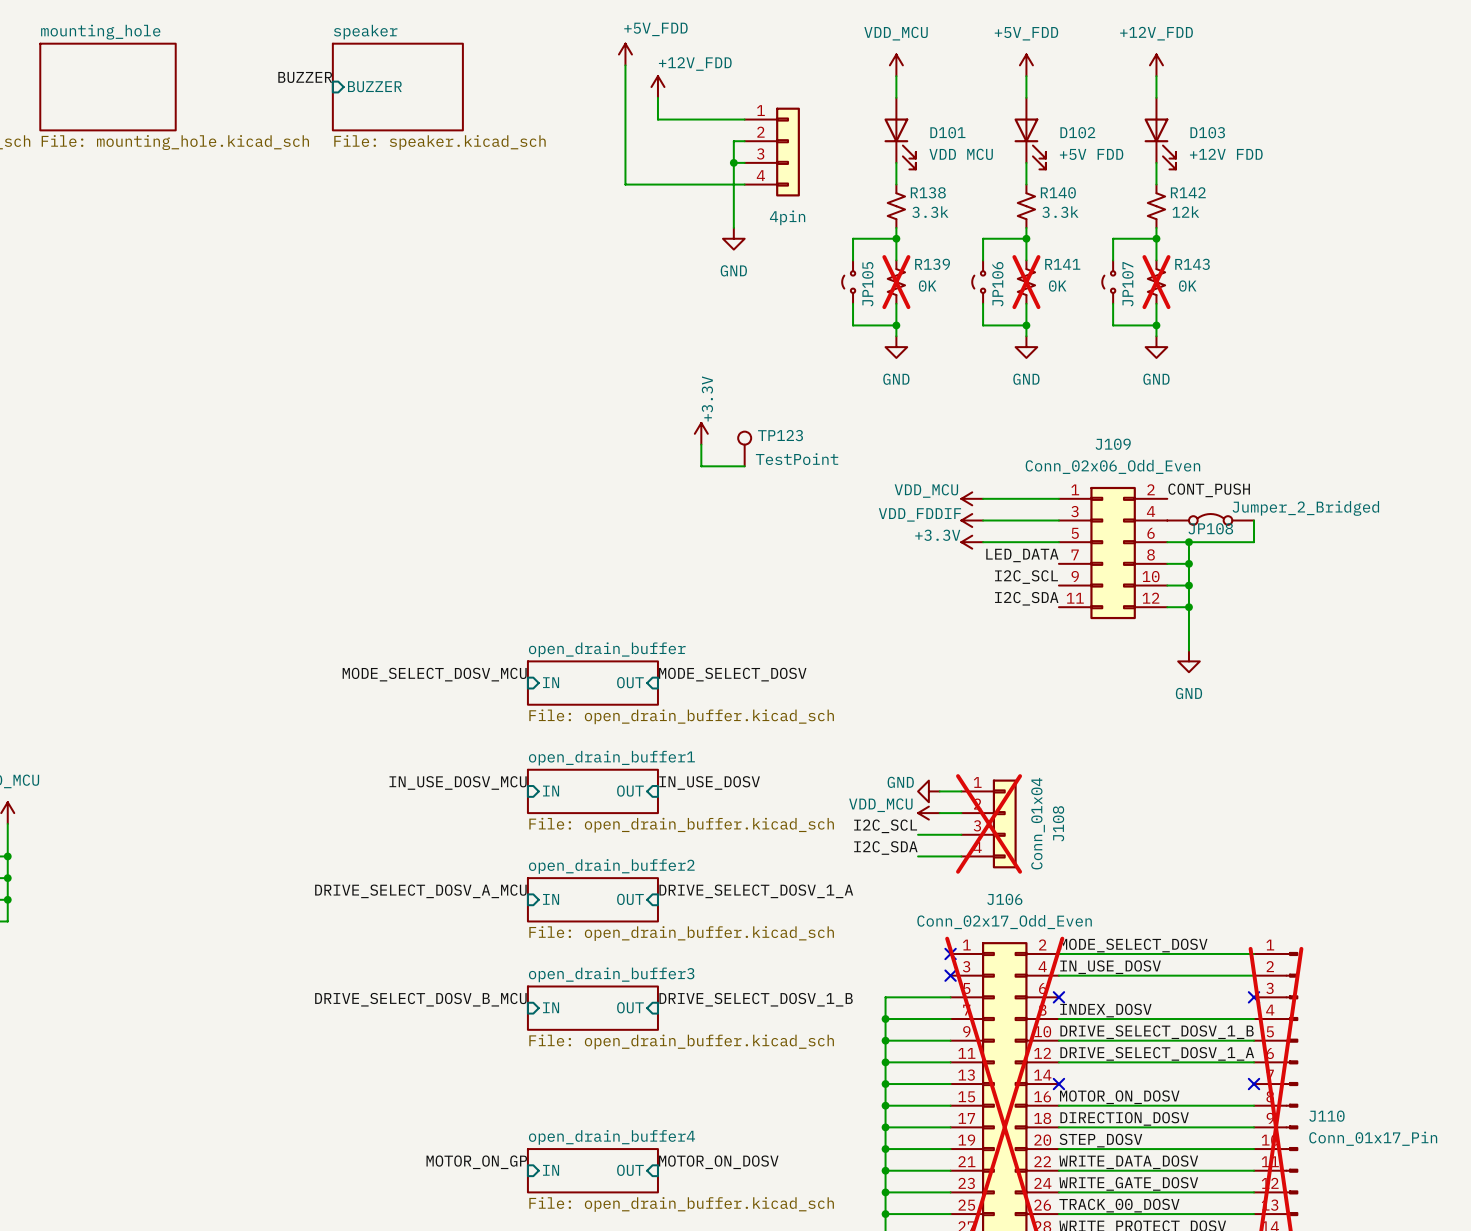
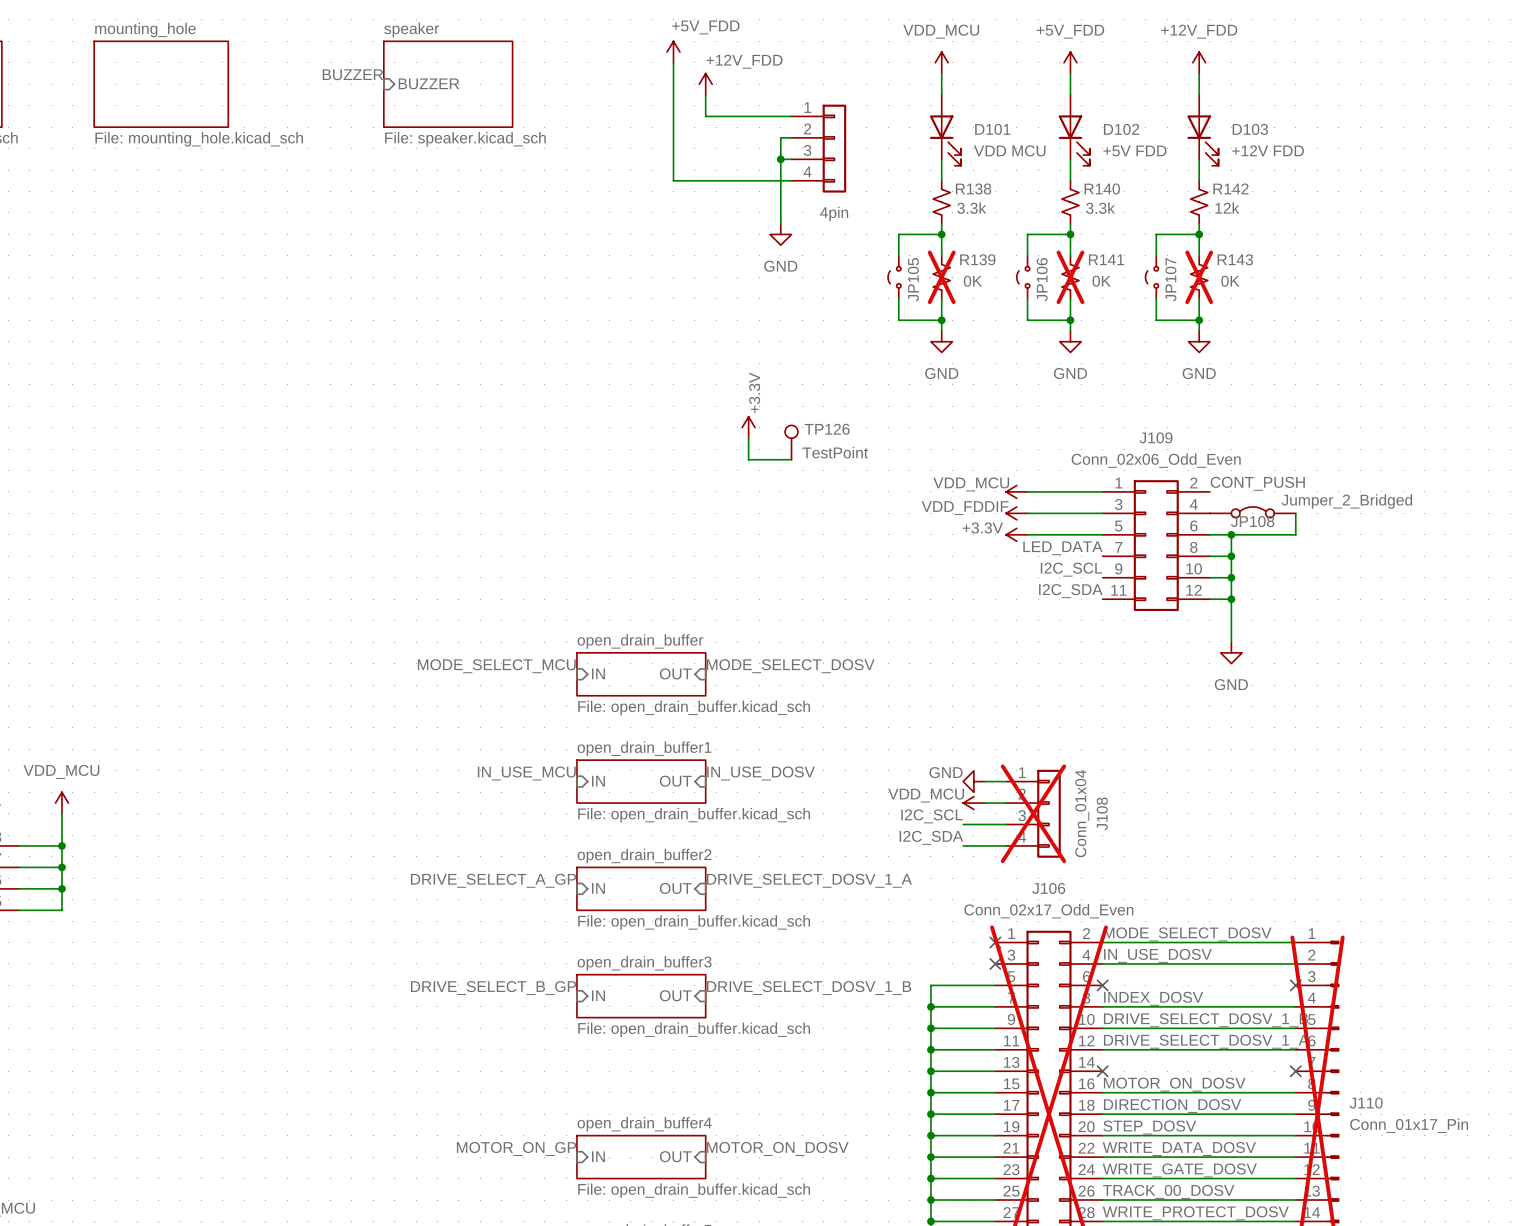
TP123 name: TP123 (780, 435) -> TP126 (827, 429)
label: MODE_SELECT_DOSV_MCU (434, 674) -> MODE_SELECT_MCU (496, 666)
label: IN_USE_DOSV_MCU (458, 782) -> IN_USE_MCU (526, 773)
label: DRIVE_SELECT_DOSV_A_MCU (420, 891) -> DRIVE_SELECT_A_GP (493, 880)
label: DRIVE_SELECT_DOSV_B_MCU (420, 999) -> DRIVE_SELECT_B_GP (493, 988)

